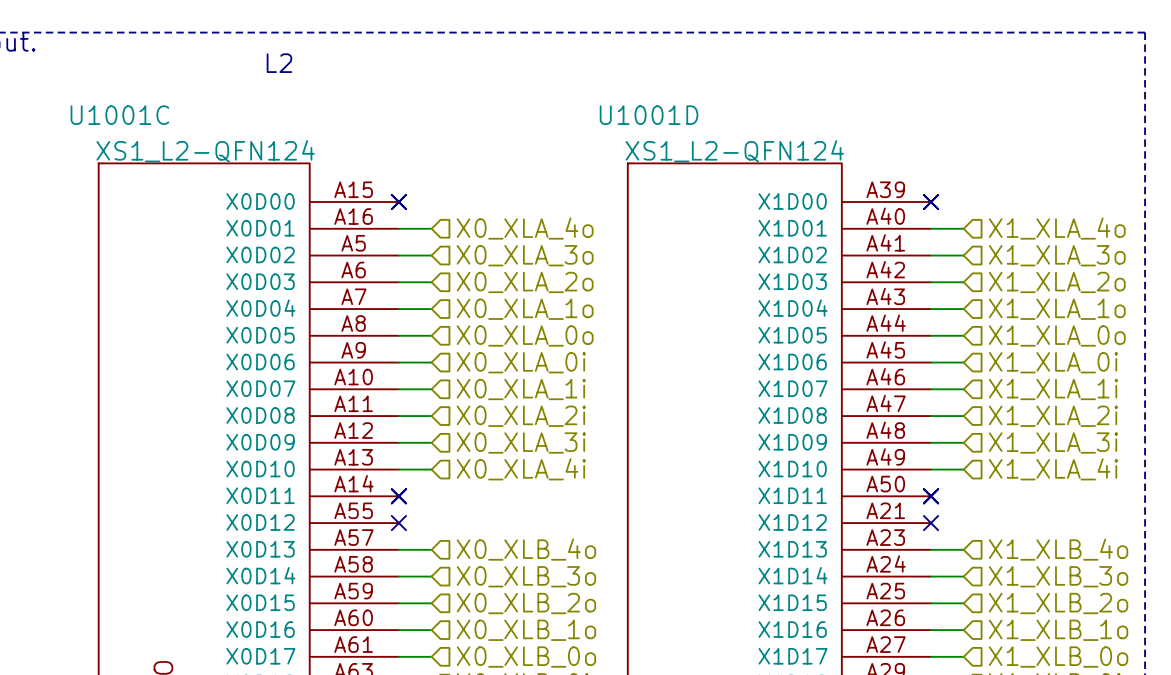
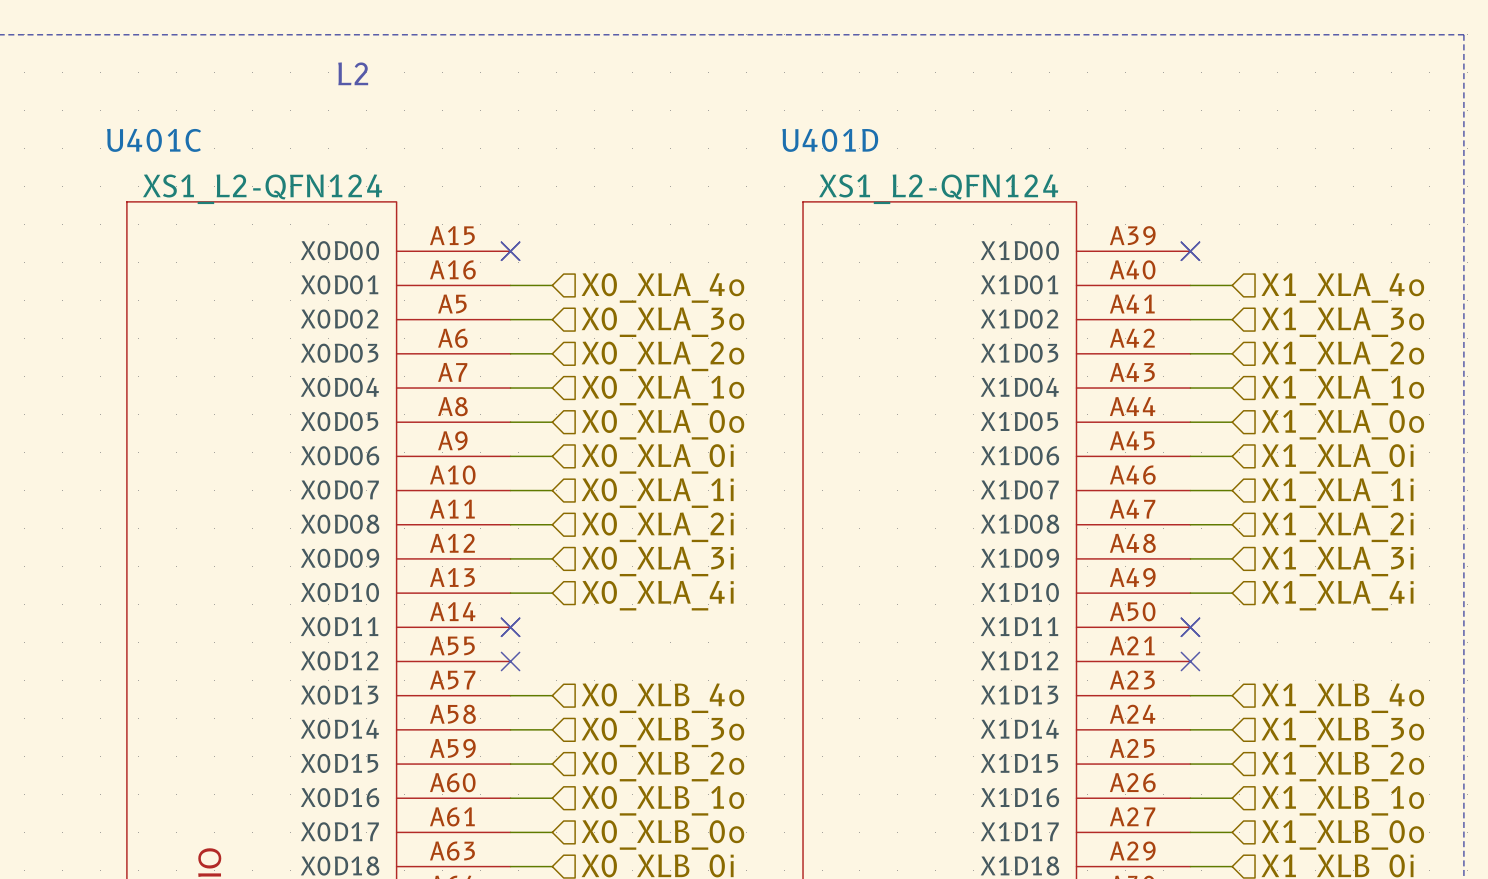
U1001C name: U1001C (119, 115) -> U401C (154, 140)
U1001D name: U1001D (649, 115) -> U401D (830, 140)

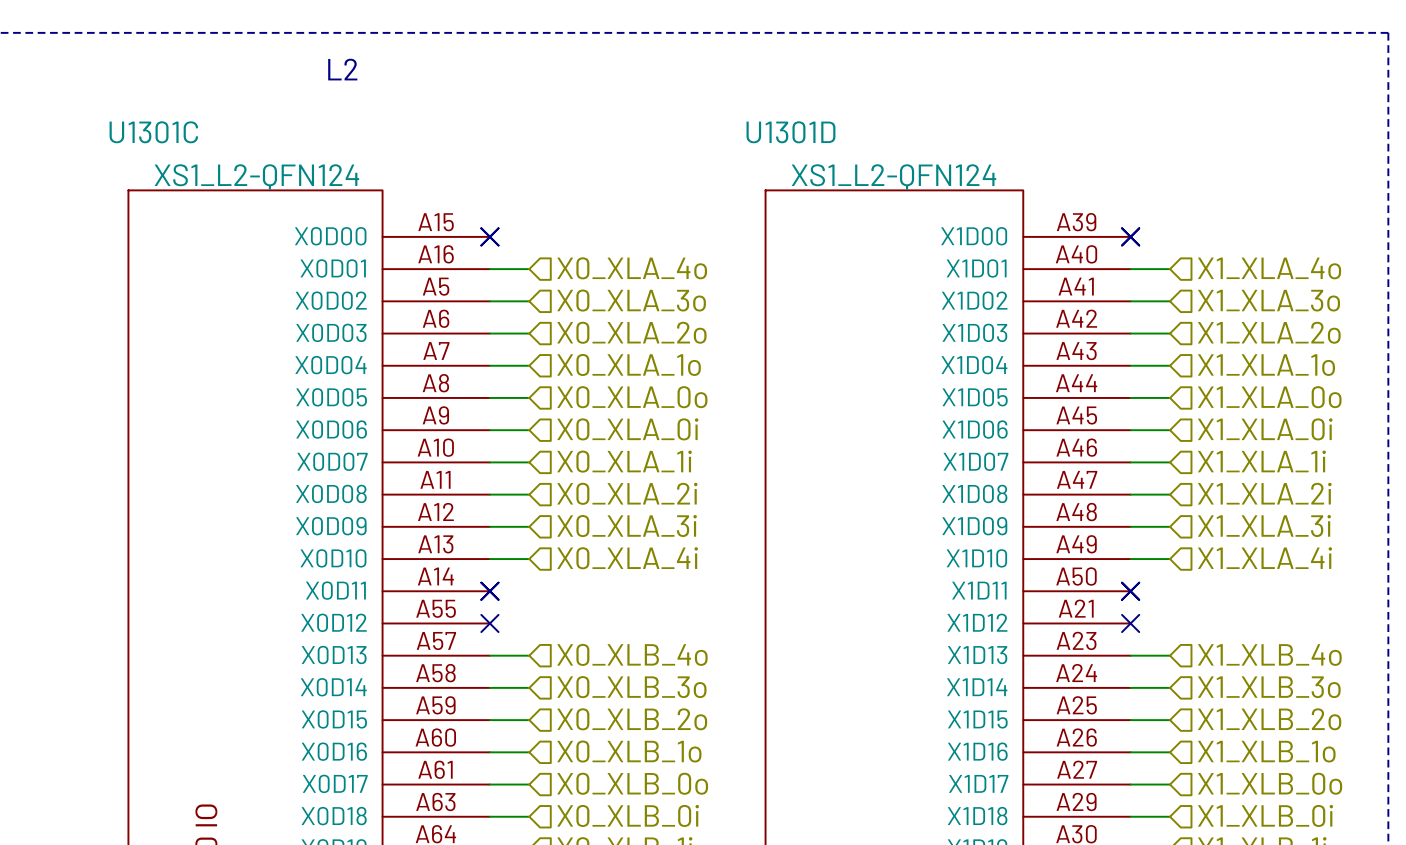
U401C name: U401C (154, 140) -> U1301C (153, 132)
U401D name: U401D (830, 140) -> U1301D (790, 132)

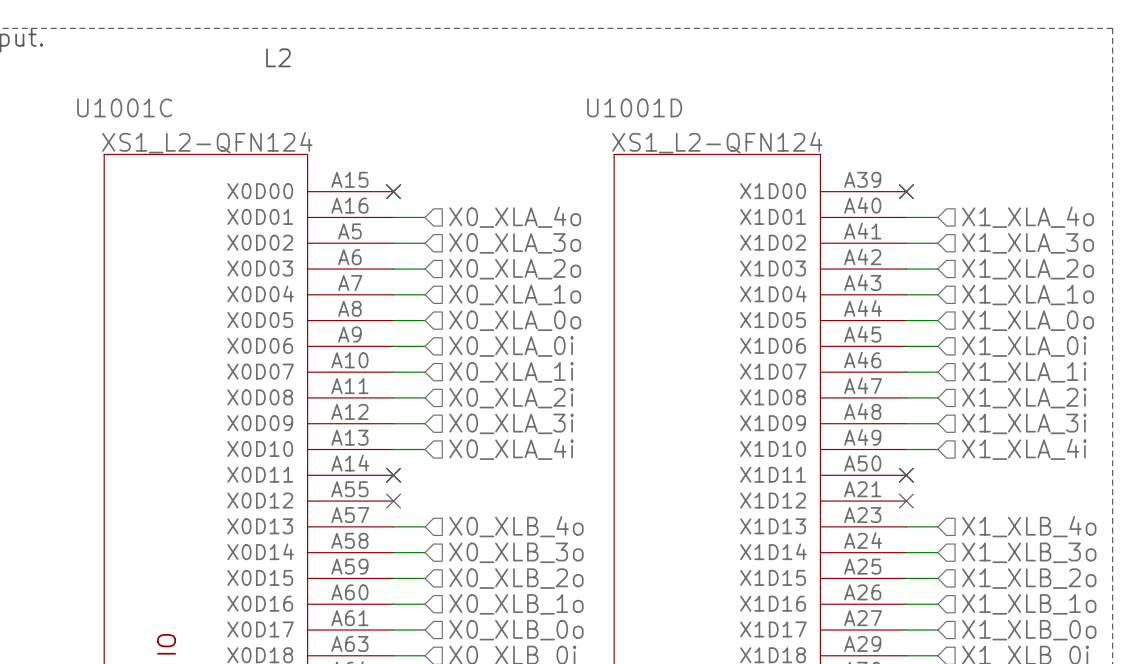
U1301C name: U1301C (153, 132) -> U1001C (124, 107)
U1301D name: U1301D (790, 132) -> U1001D (634, 107)

